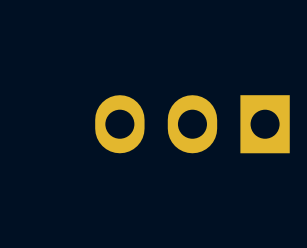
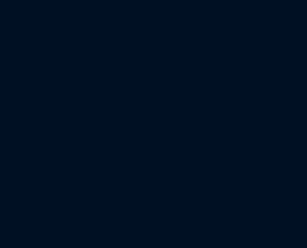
part: (192, 124) -> none

